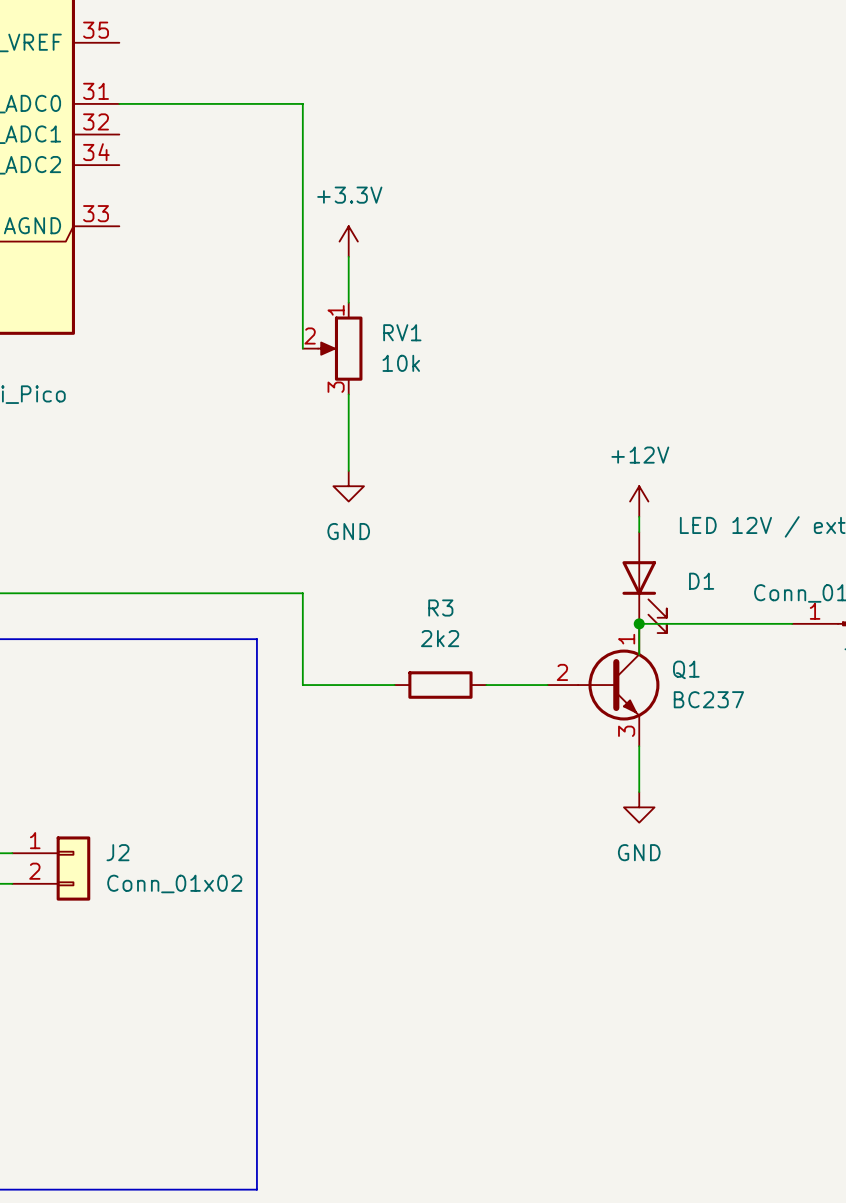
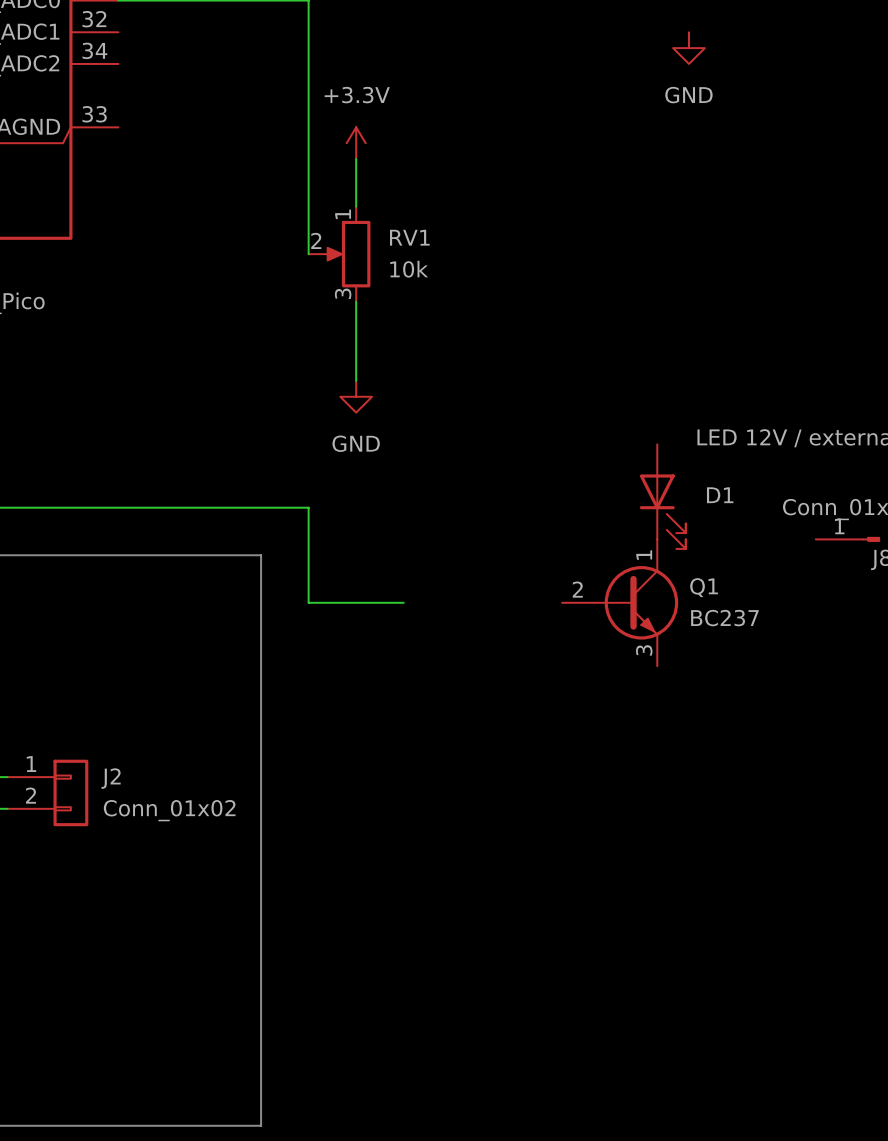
power symbol: none -> GND (688, 48)
power symbol: +12V (639, 501) -> none
wire: (639, 516) (639, 532) -> none
junction: (639, 623) -> none
wire: (792, 623) (639, 623) (639, 654) -> none
R3: 2k2 (440, 685) -> none
wire: (486, 685) (547, 685) -> none
wire: (639, 746) (639, 792) -> none
power symbol: GND (639, 807) -> none

